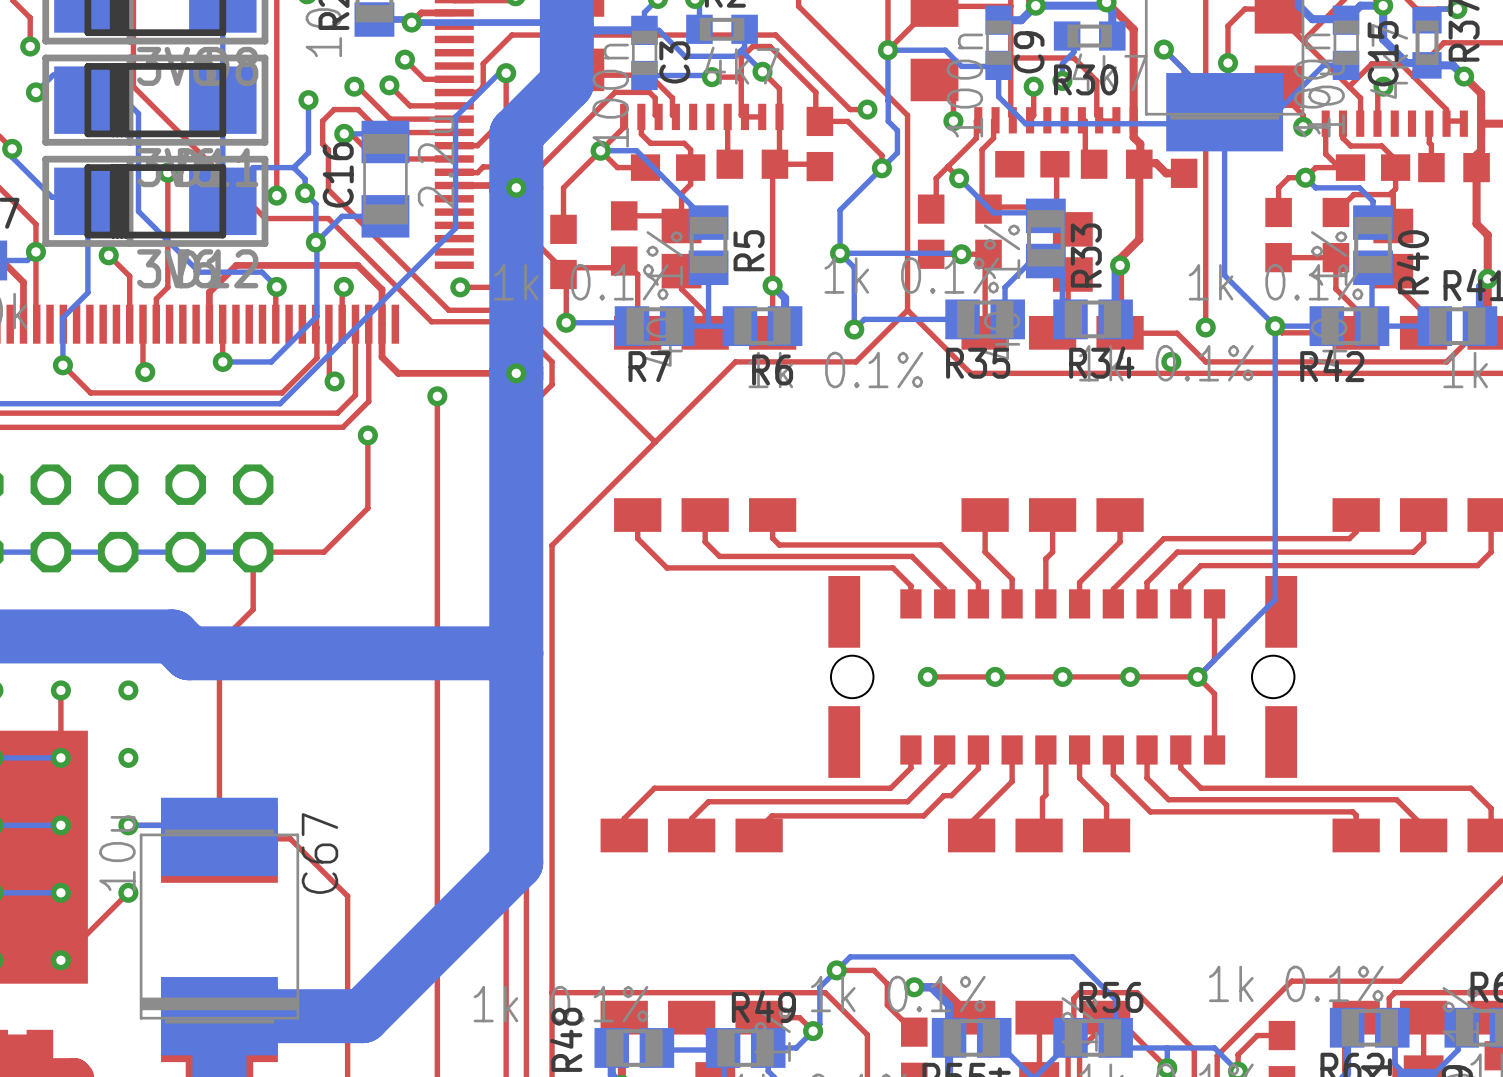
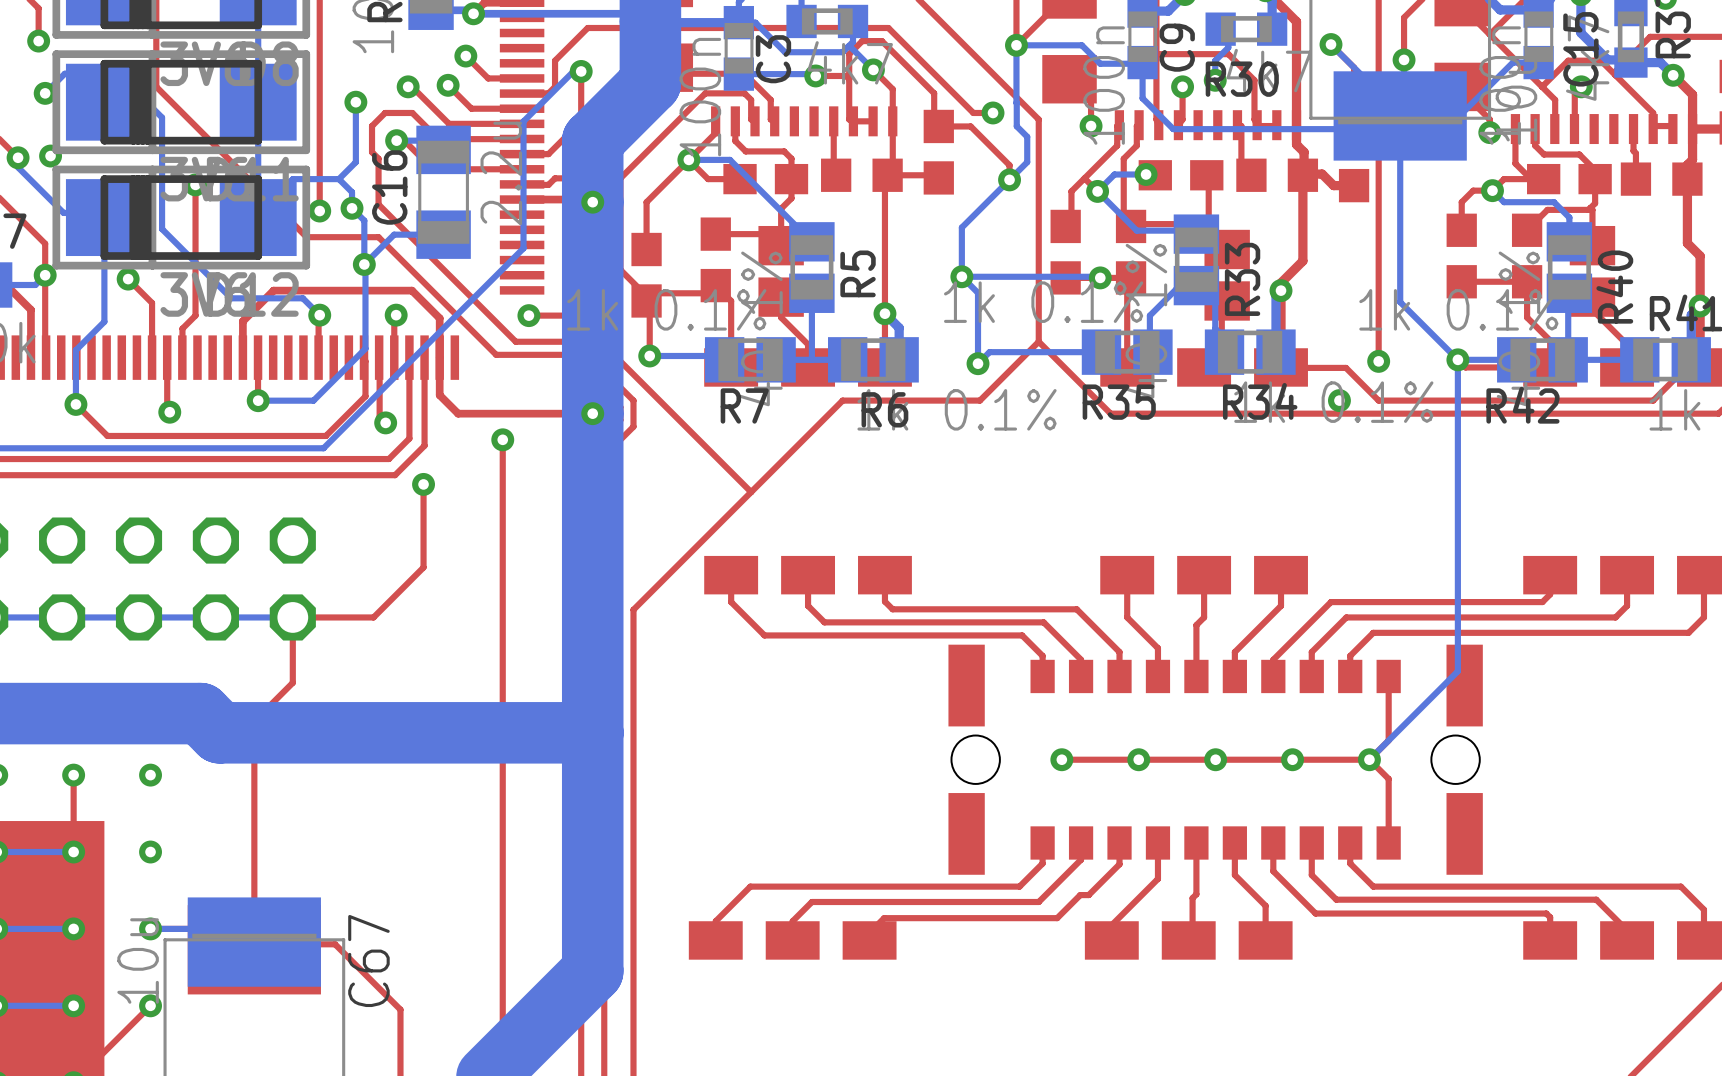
via: none -> (50, 156)
bottom track: none -> (1146, 174) (1114, 174) (1097, 191)
via: none -> (1146, 174)

